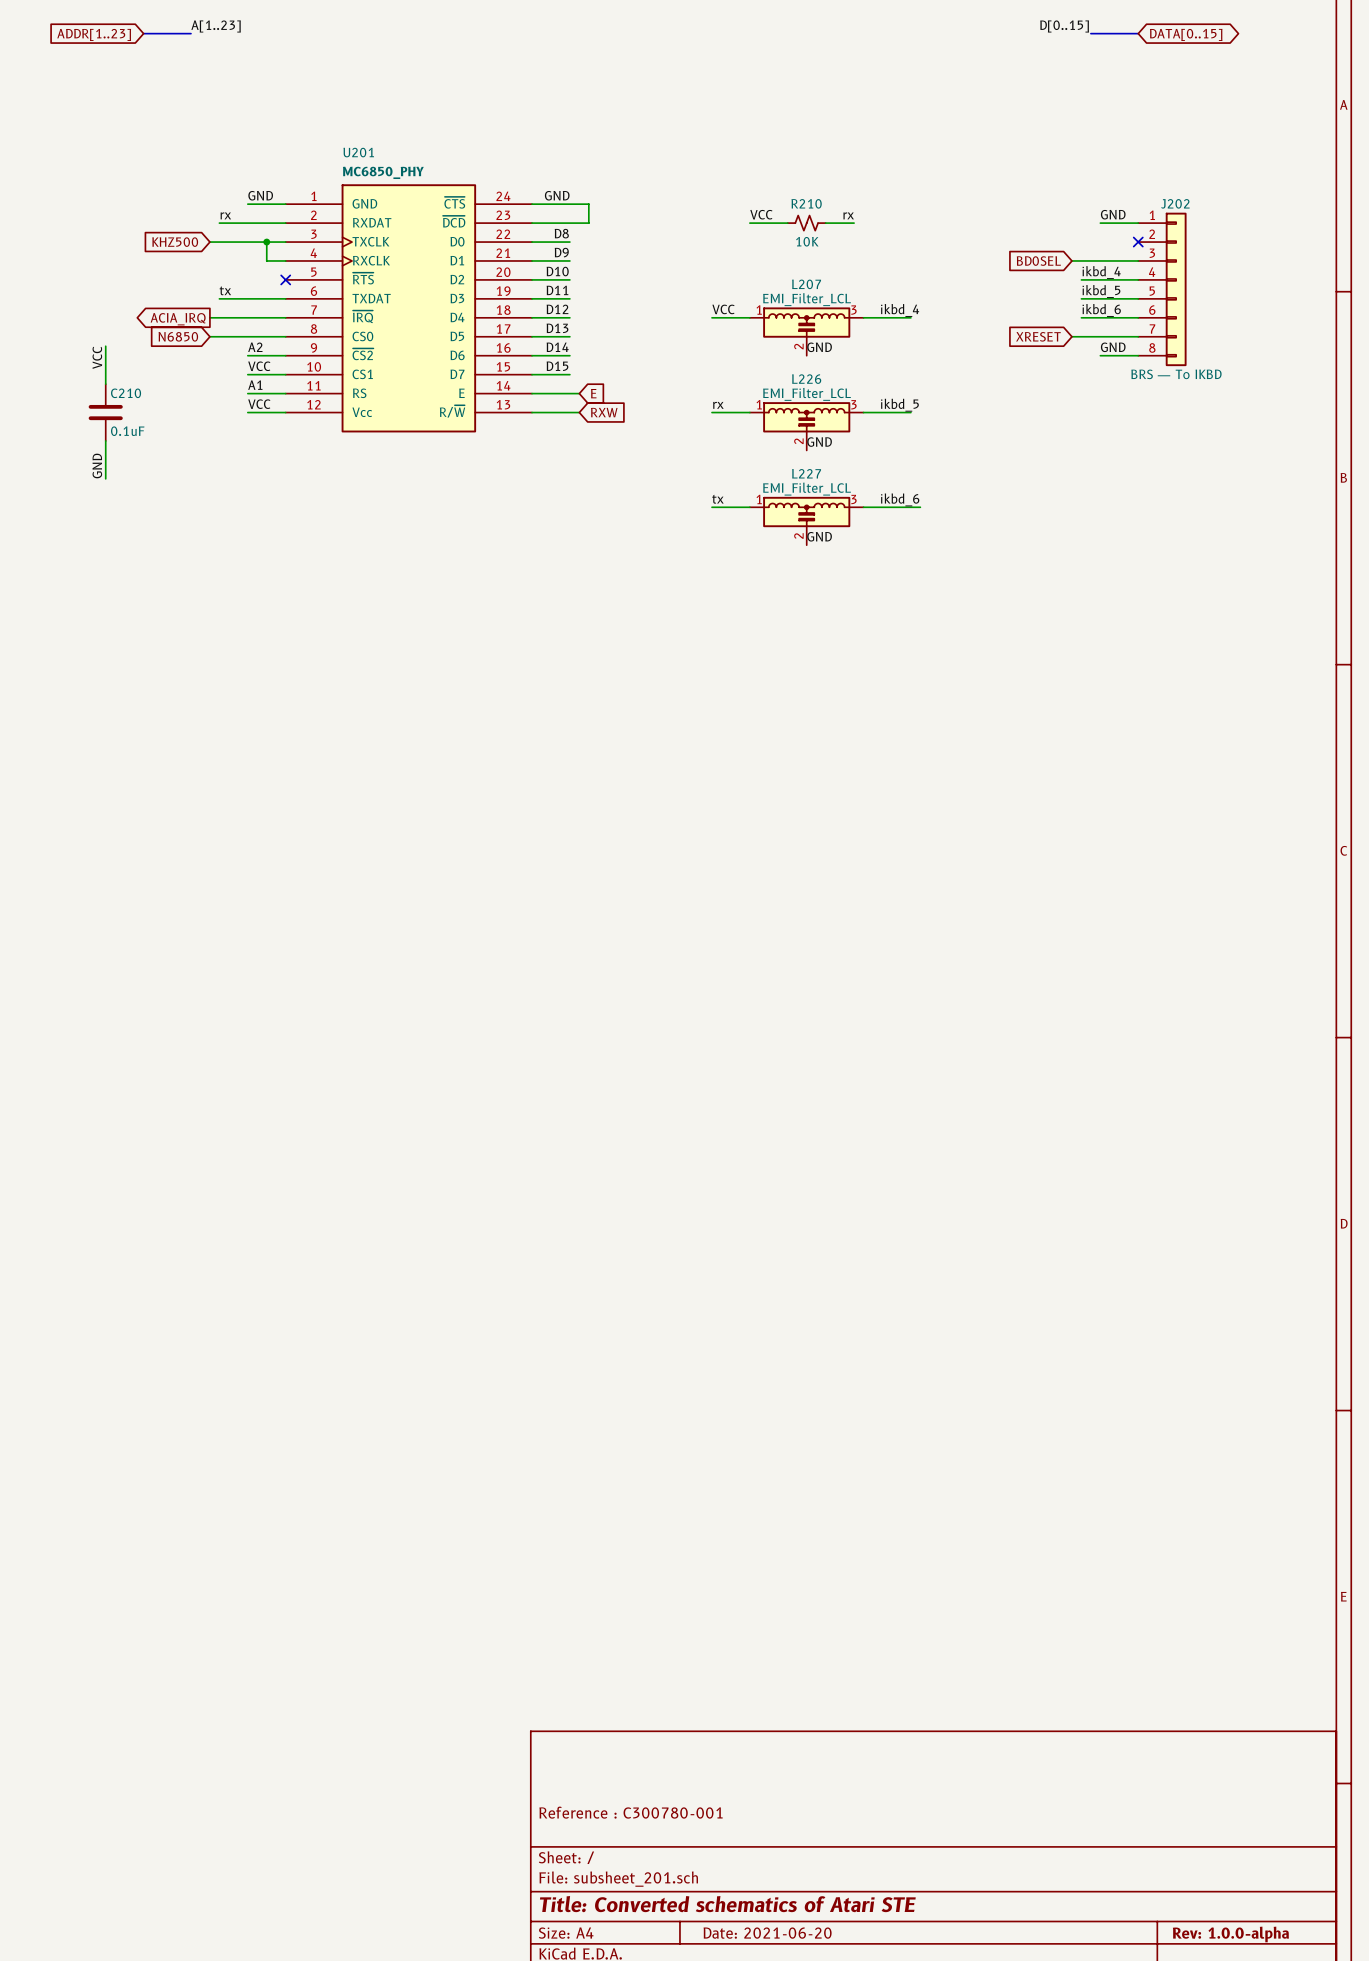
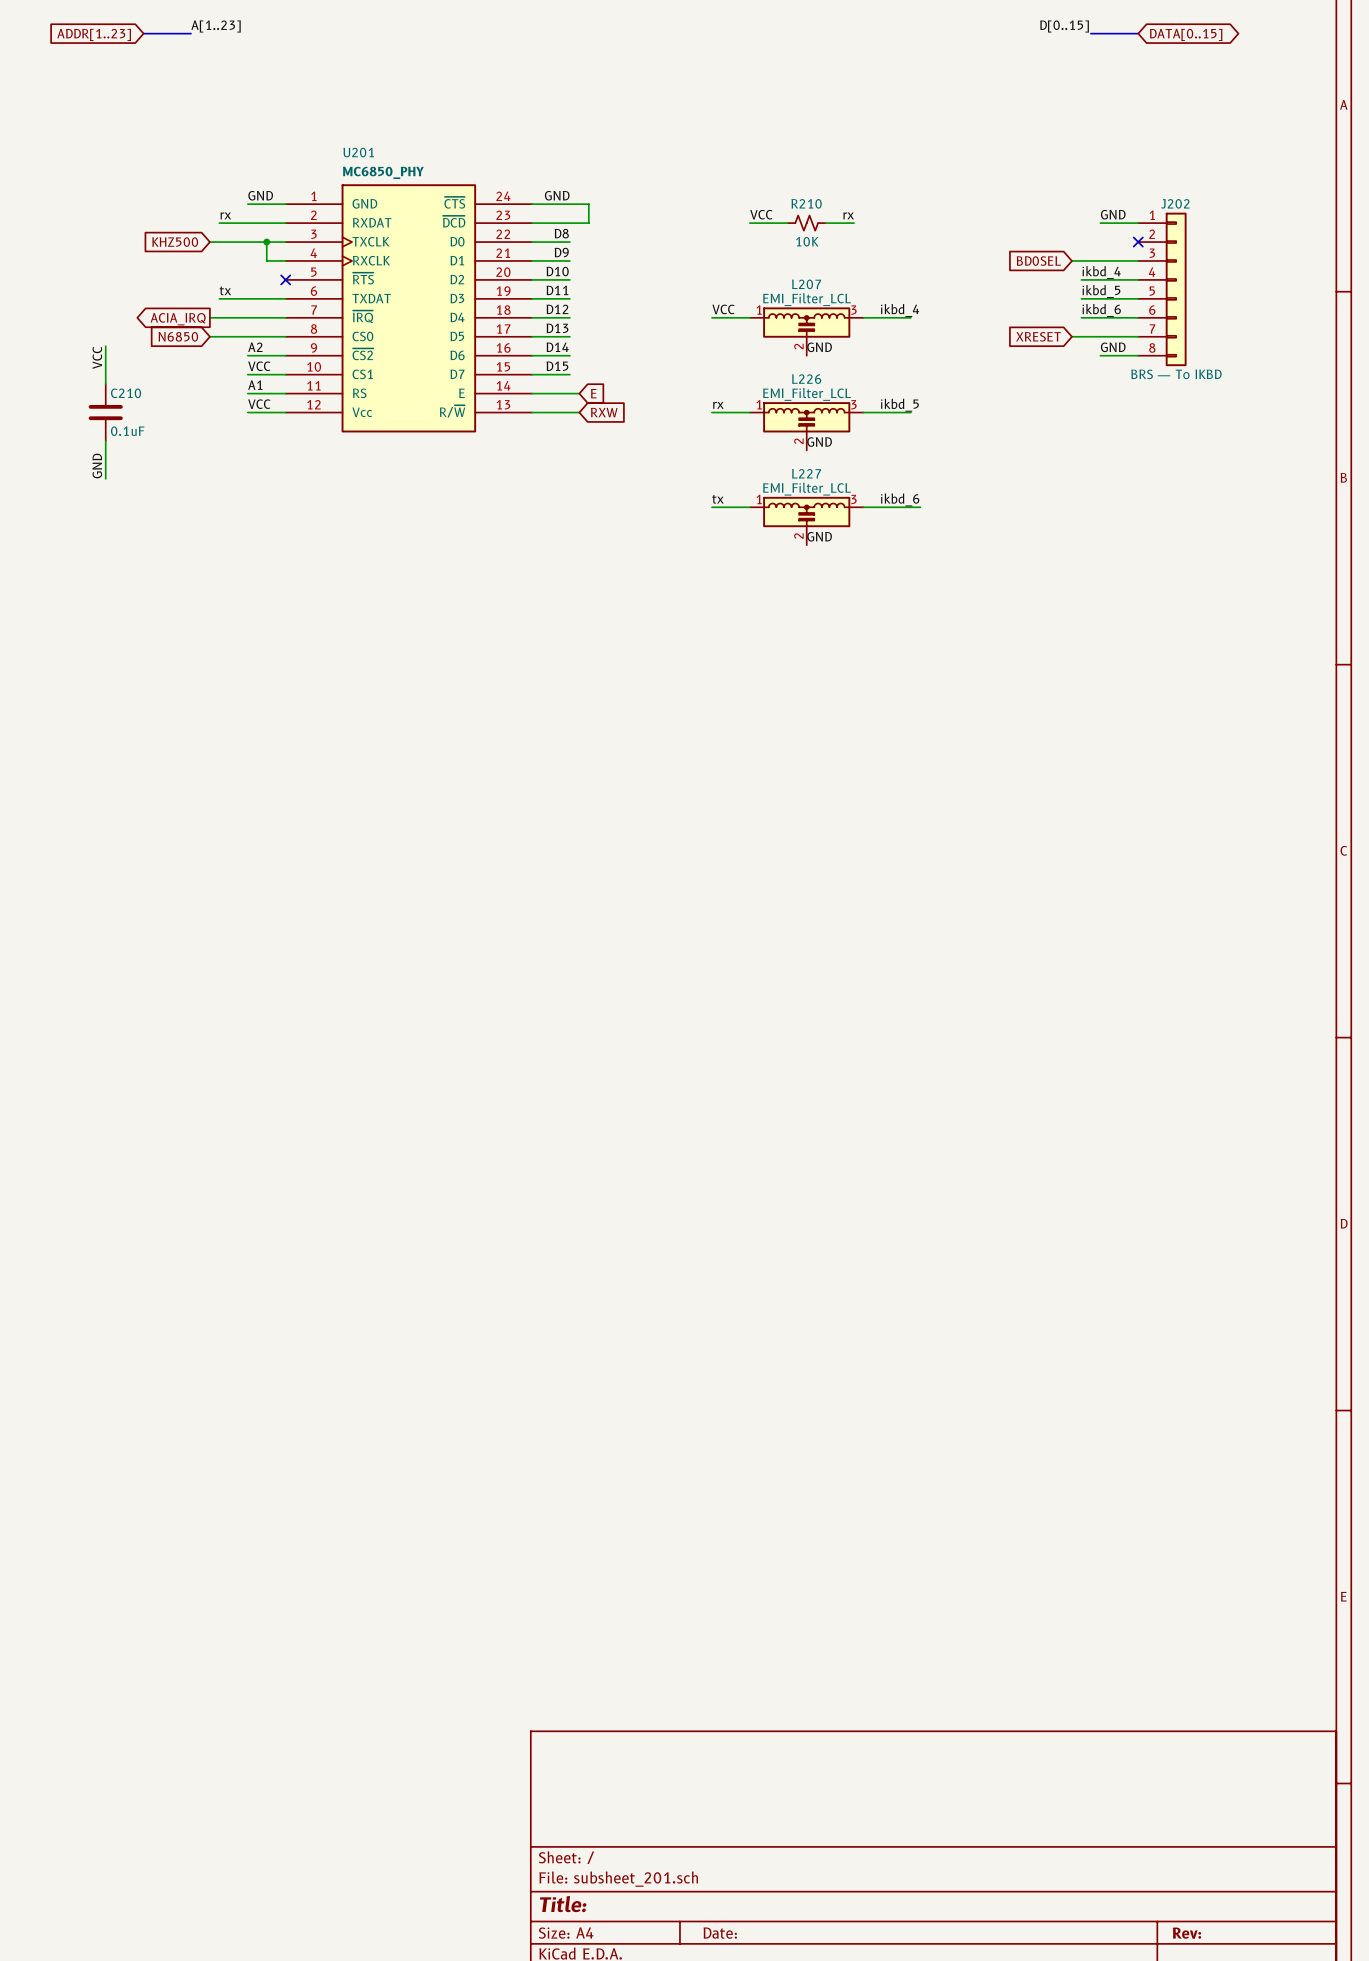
title block: Reference : C300780-001 (631, 1812) -> none
title block: Title: Converted schematics of Atari STE (727, 1904) -> Title: (563, 1904)
title block: Date: 2021-06-20 (767, 1933) -> Date: (720, 1933)
title block: Rev: 1.0.0-alpha (1230, 1934) -> Rev: (1186, 1933)

